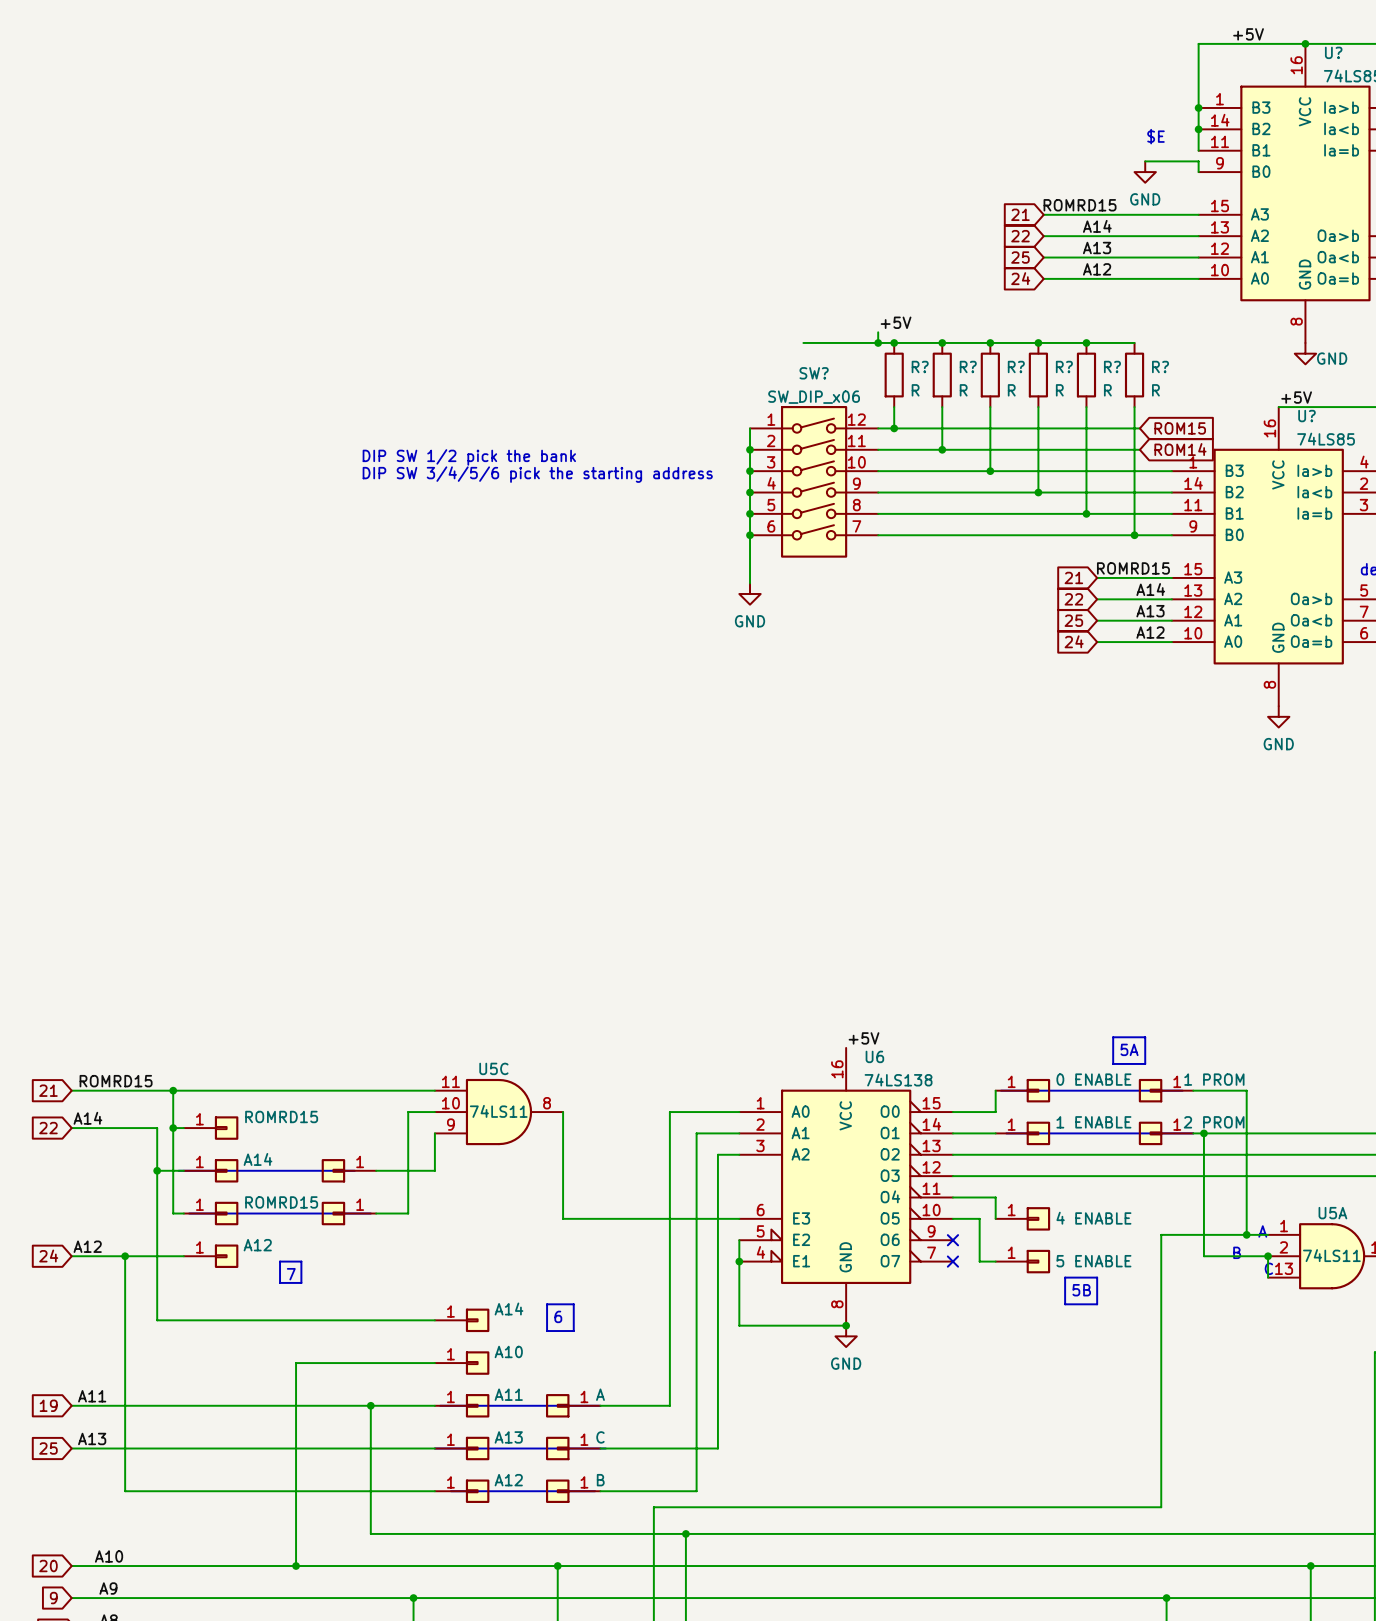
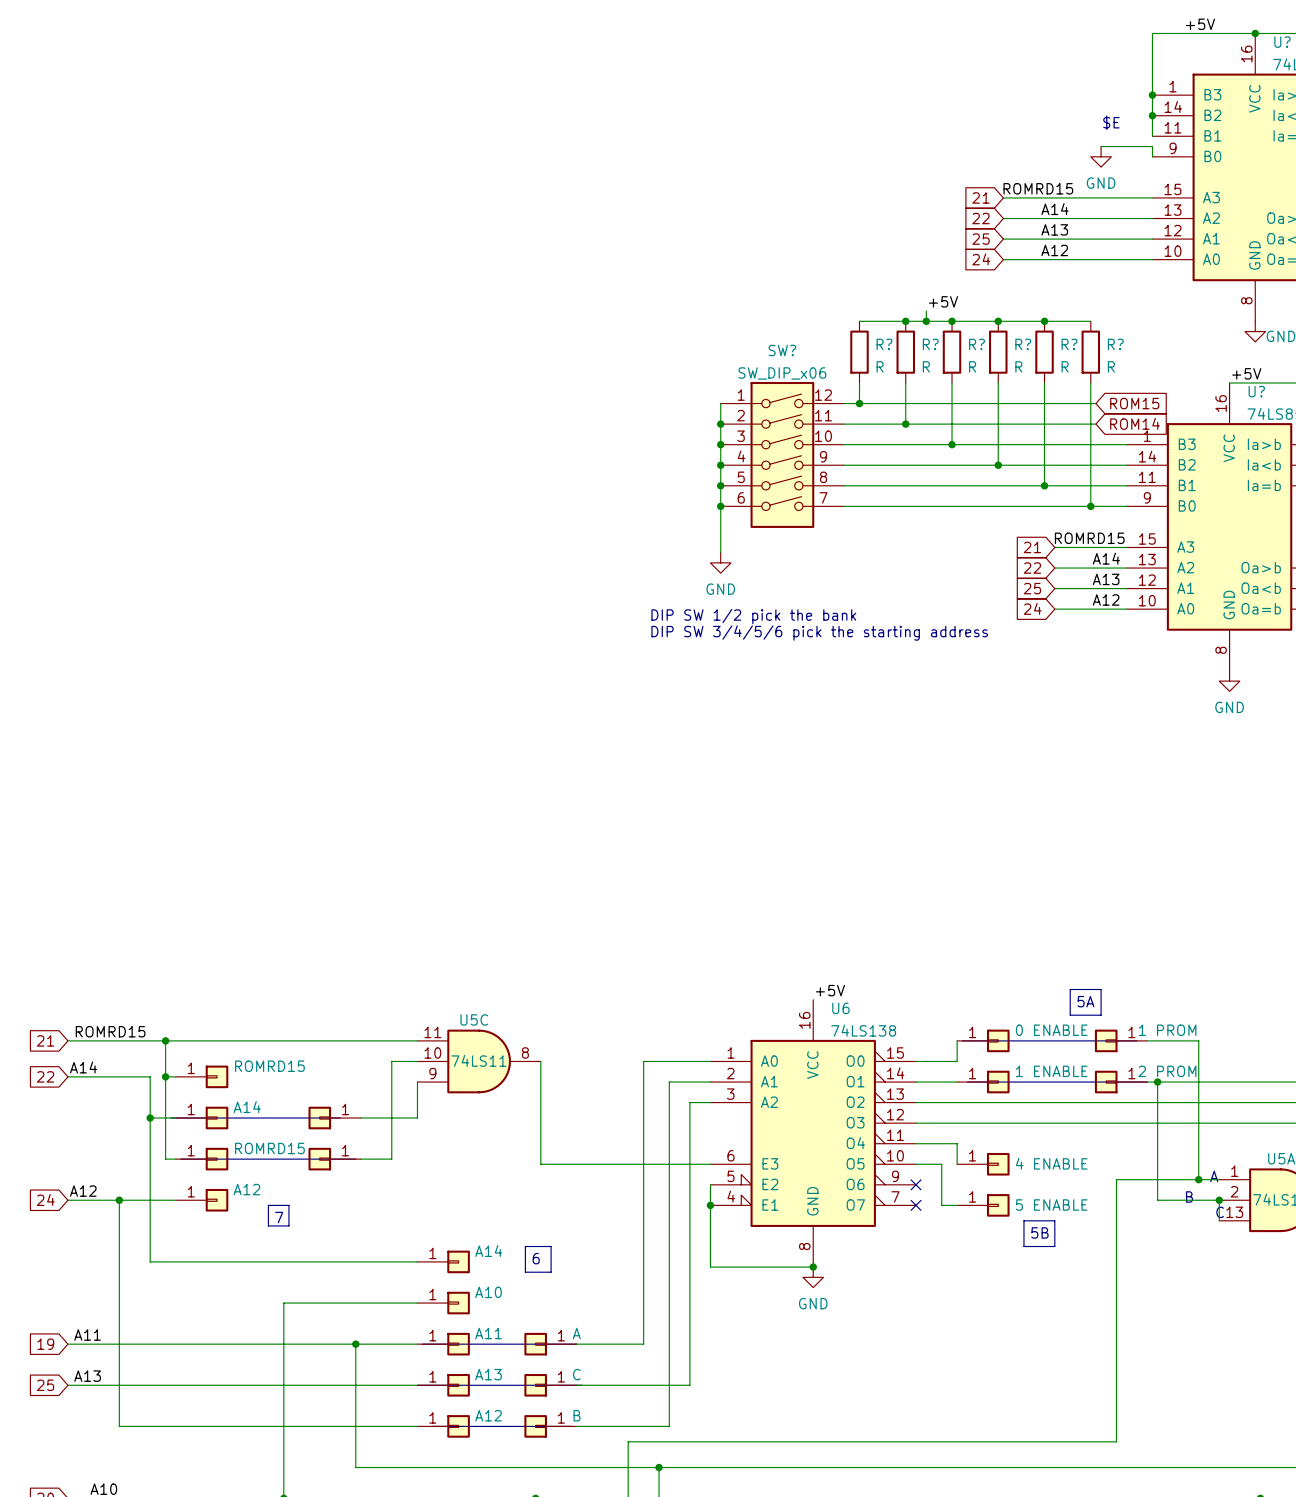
label position: +5V (896, 322) -> +5V (943, 301)
wire: (878, 332) (878, 342) -> (926, 311) (926, 321)
wire: (803, 342) (894, 342) -> none
junction: (878, 342) -> none
junction: (894, 342) -> none
junction: none -> (926, 321)
text: DIP SW 1/2 pick the bank (469, 457) -> none
text: DIP SW 3/4/5/6 pick the starting address (537, 474) -> none
text: none -> DIP SW 1/2 pick the bank (753, 616)
text: none -> DIP SW 3/4/5/6 pick the starting address (819, 633)

